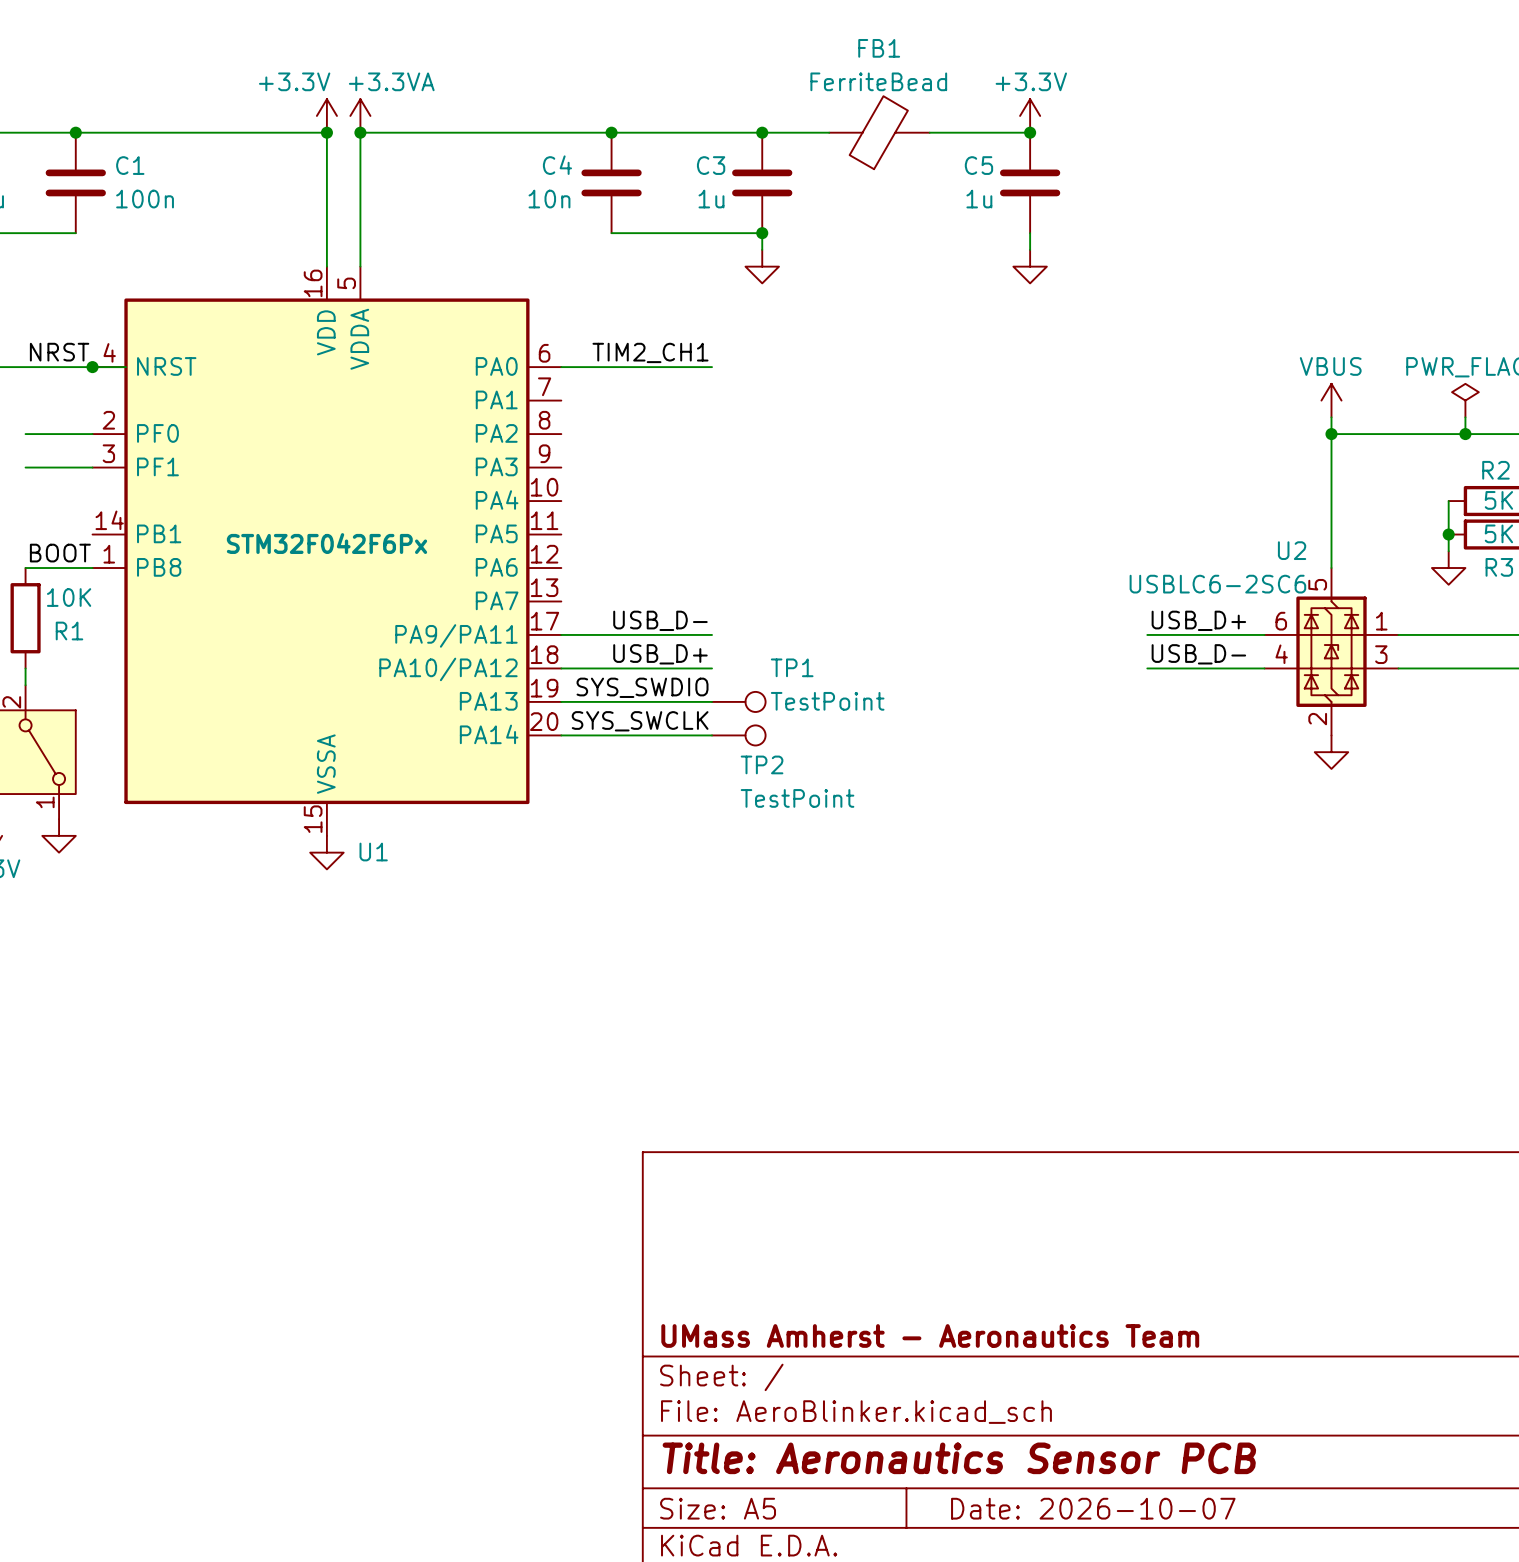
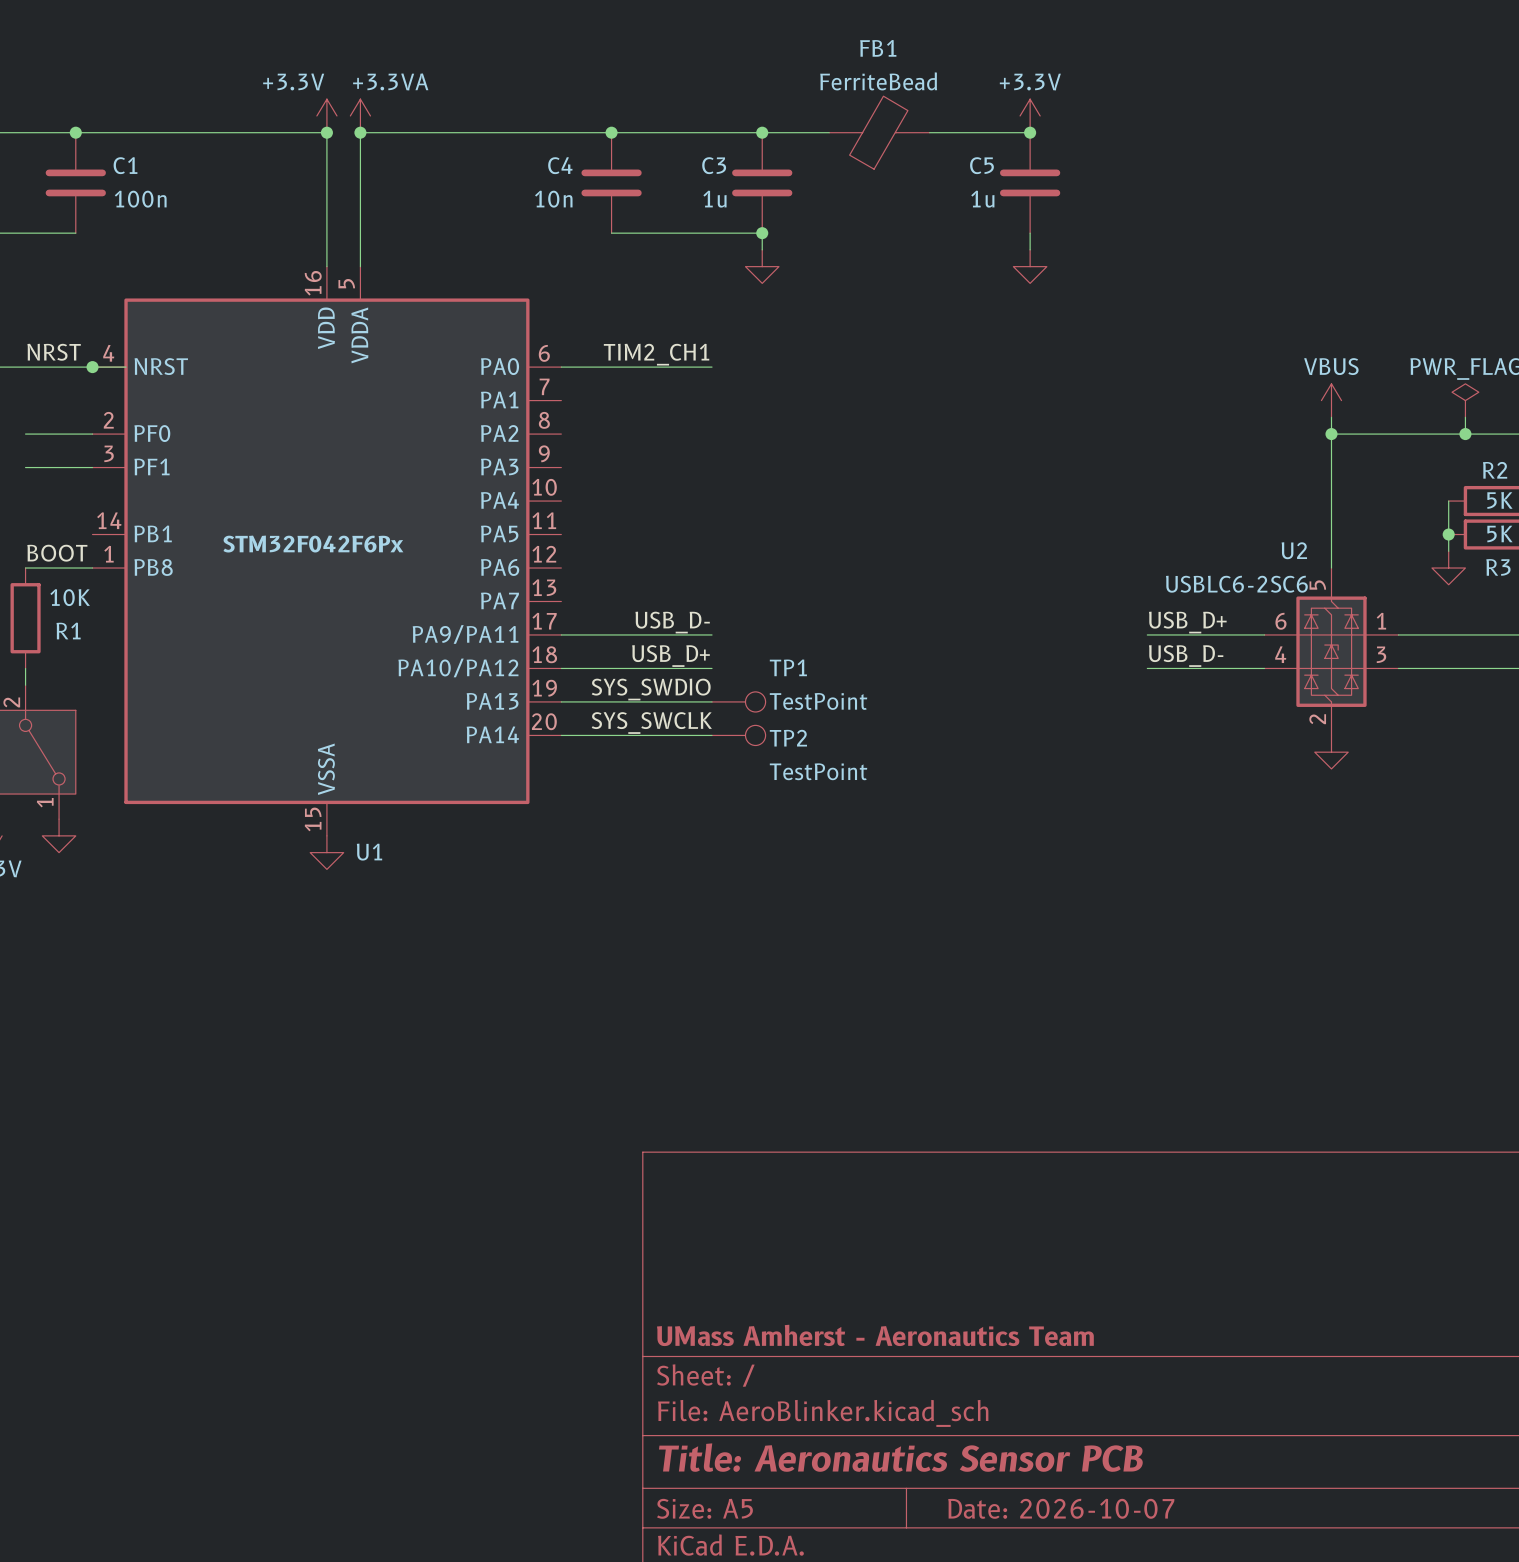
TP2 name position: TP2 (762, 764) -> TP2 (788, 738)
TP2 value position: TestPoint (797, 798) -> TestPoint (818, 771)

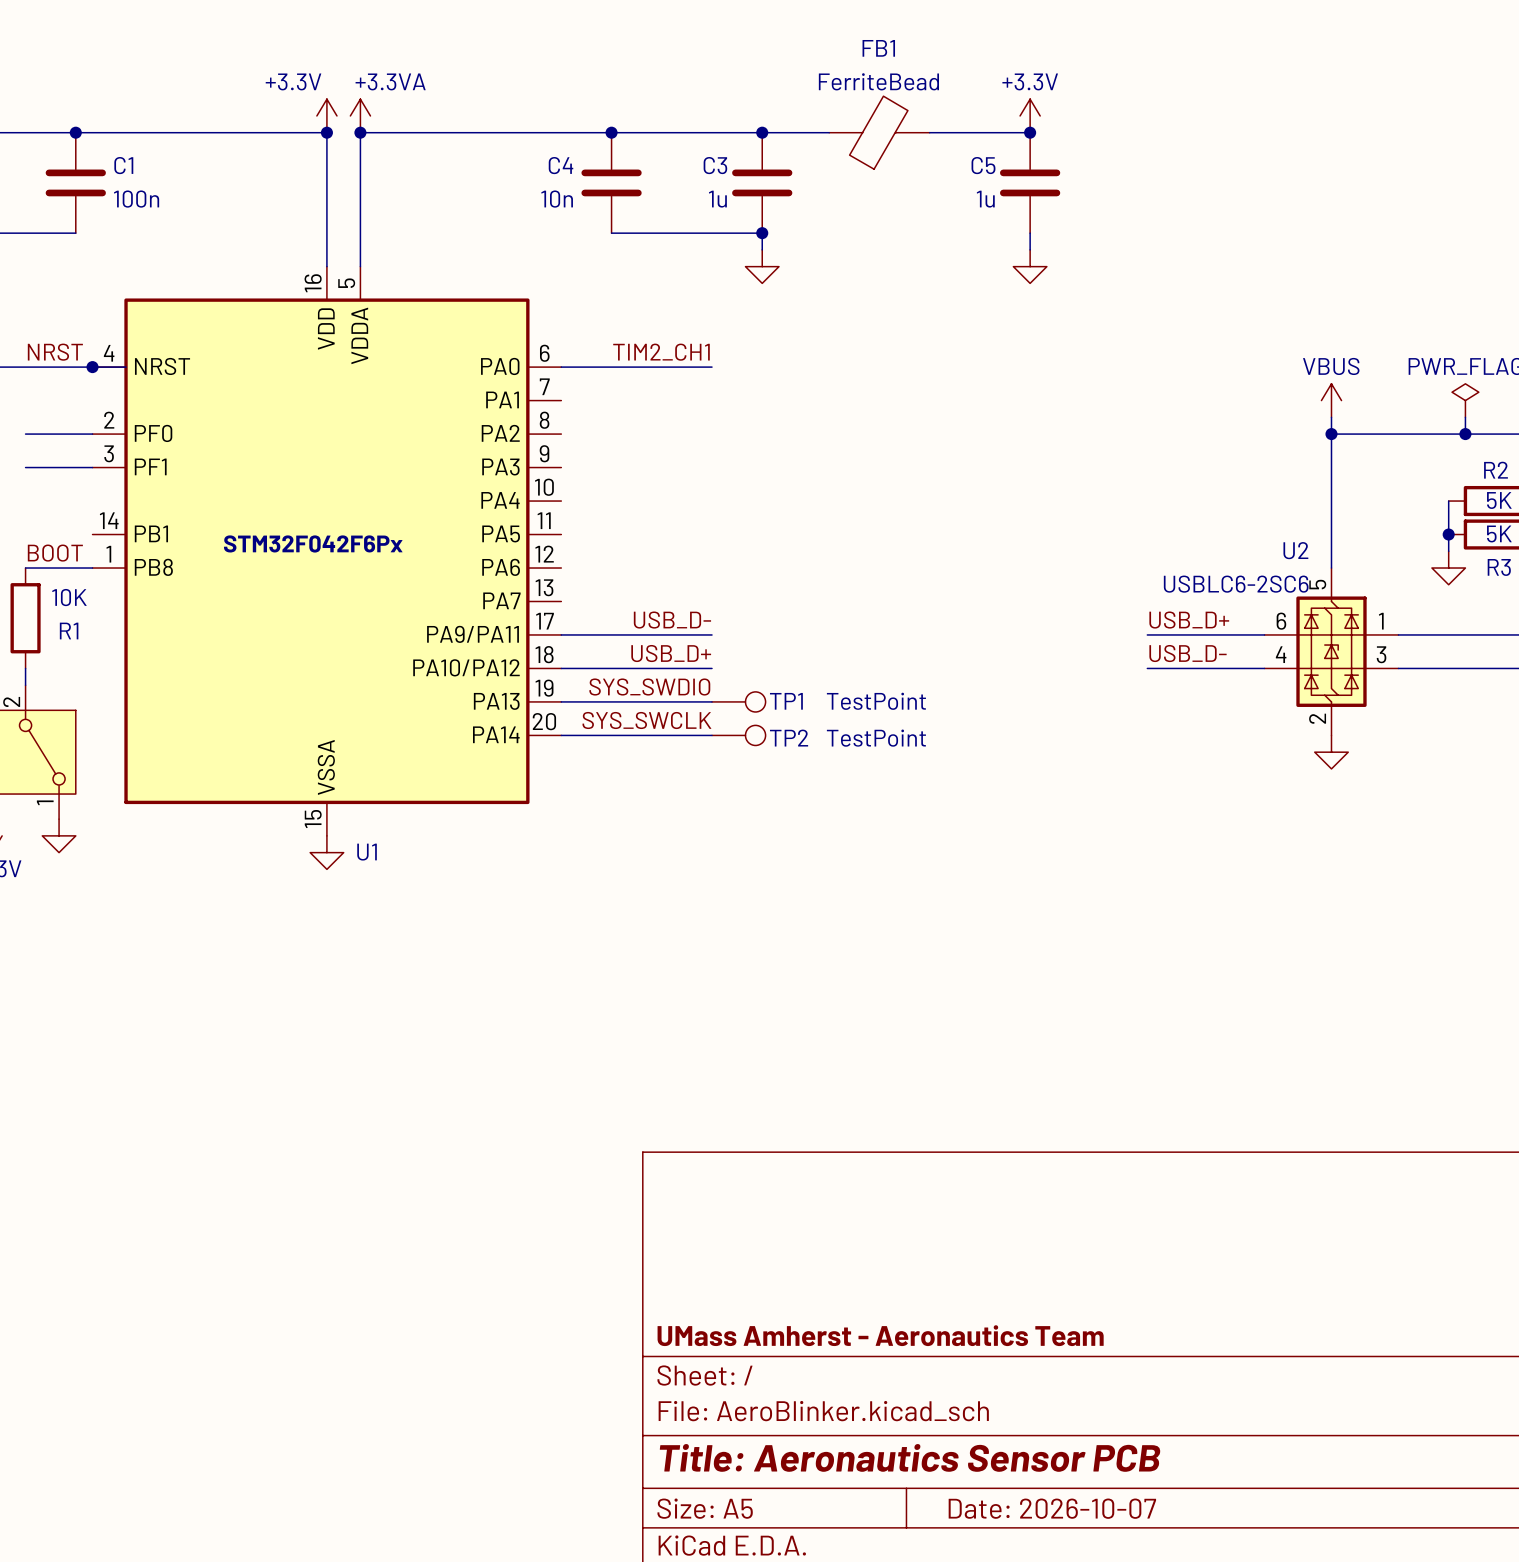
TP1 name position: TP1 (788, 667) -> TP1 (786, 701)
TP1 value position: TestPoint (818, 701) -> TestPoint (876, 701)
TP2 value position: TestPoint (818, 771) -> TestPoint (876, 738)

